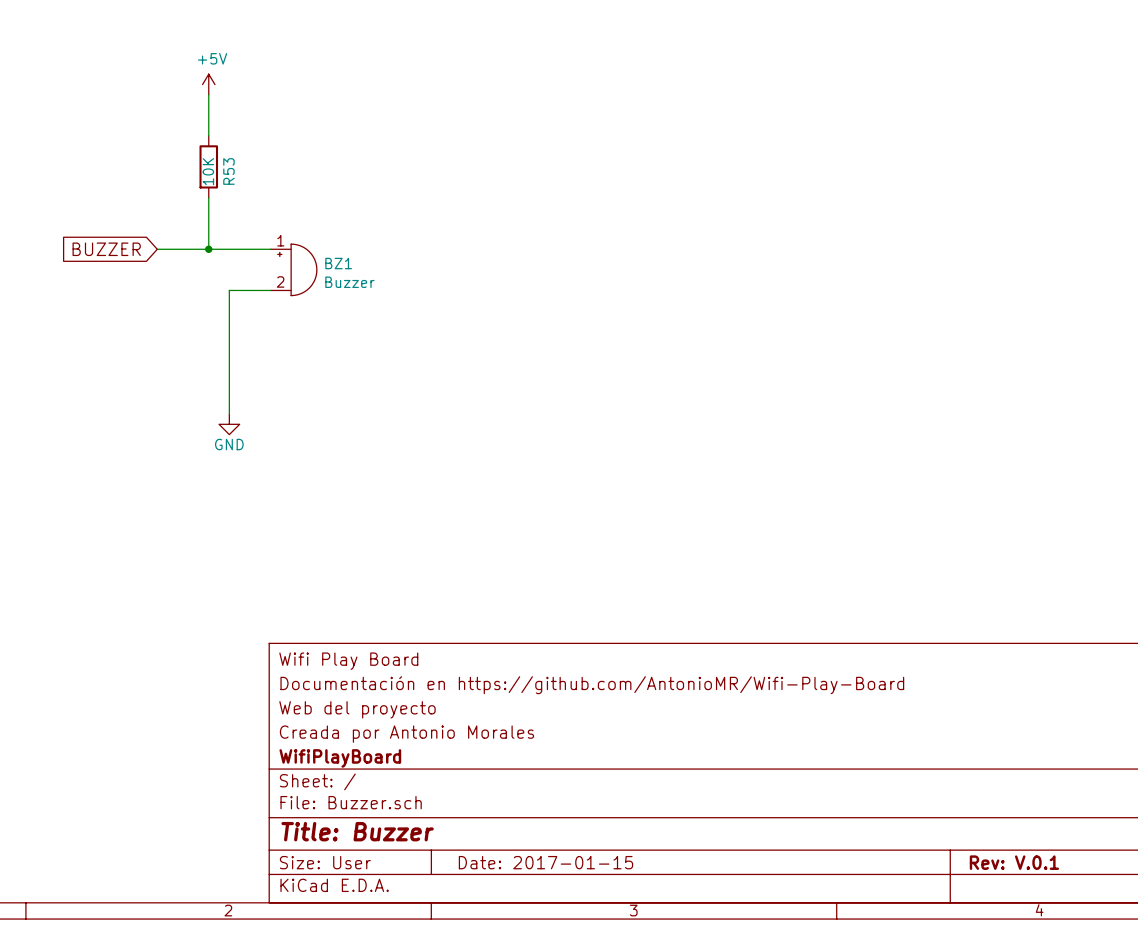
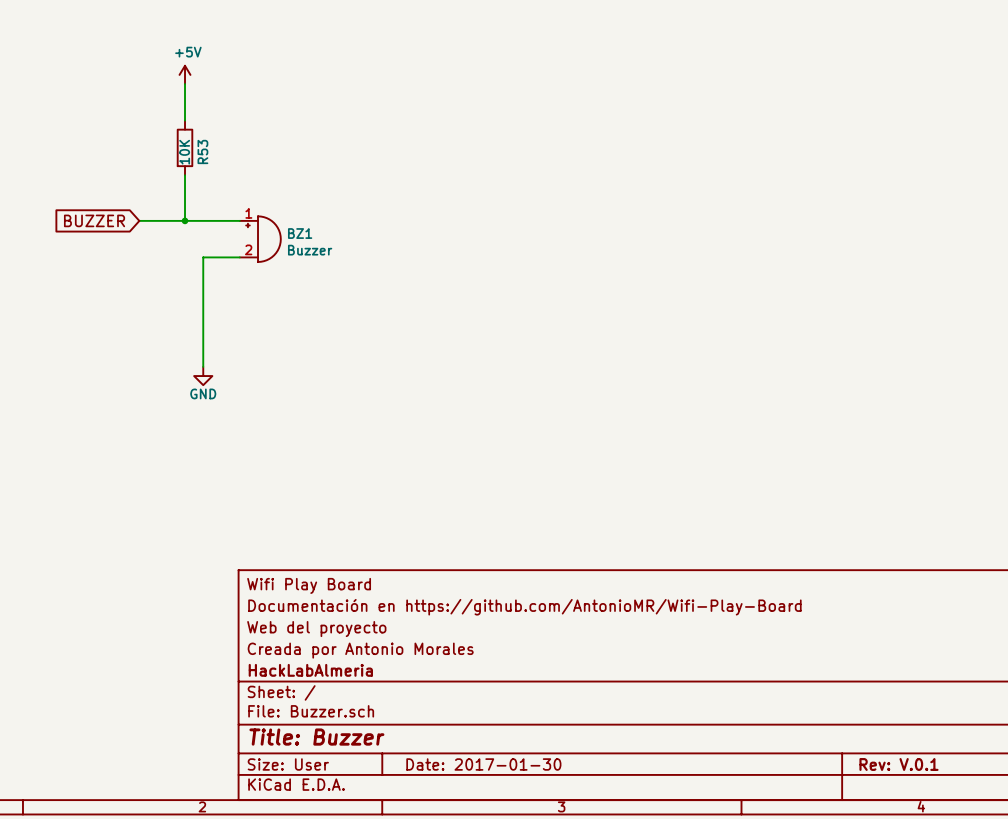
title block: WifiPlayBoard (340, 758) -> HackLabAlmeria (310, 670)
title block: Date: 2017-01-15 (545, 862) -> Date: 2017-01-30 (483, 764)

